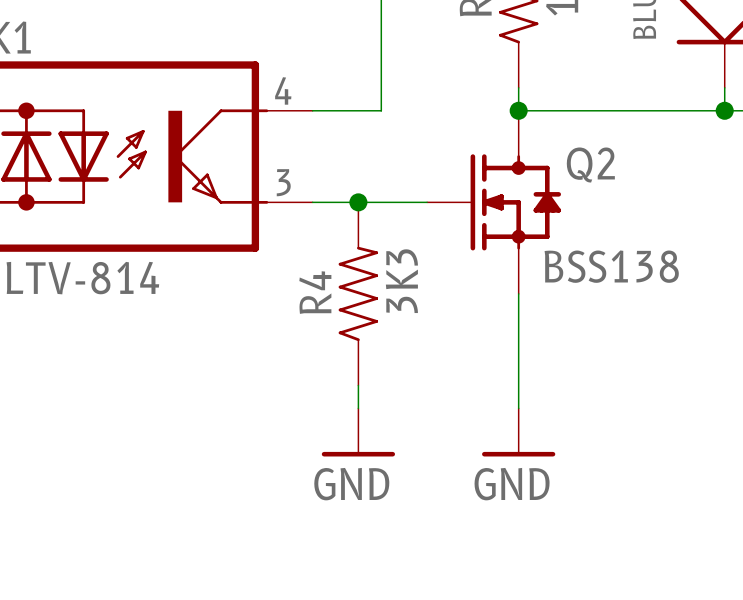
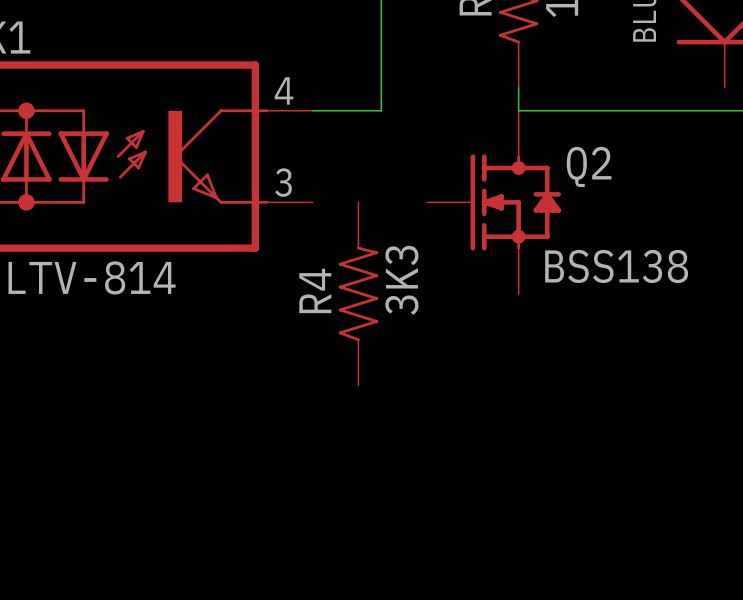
wire: (724, 87) (724, 110) -> none
junction: (518, 110) -> none
junction: (724, 110) -> none
wire: (312, 202) (427, 202) -> none
junction: (358, 202) -> none
wire: (518, 293) (518, 408) -> none
wire: (358, 385) (358, 408) -> none
power symbol: GND (358, 432) -> none
power symbol: GND (518, 432) -> none

